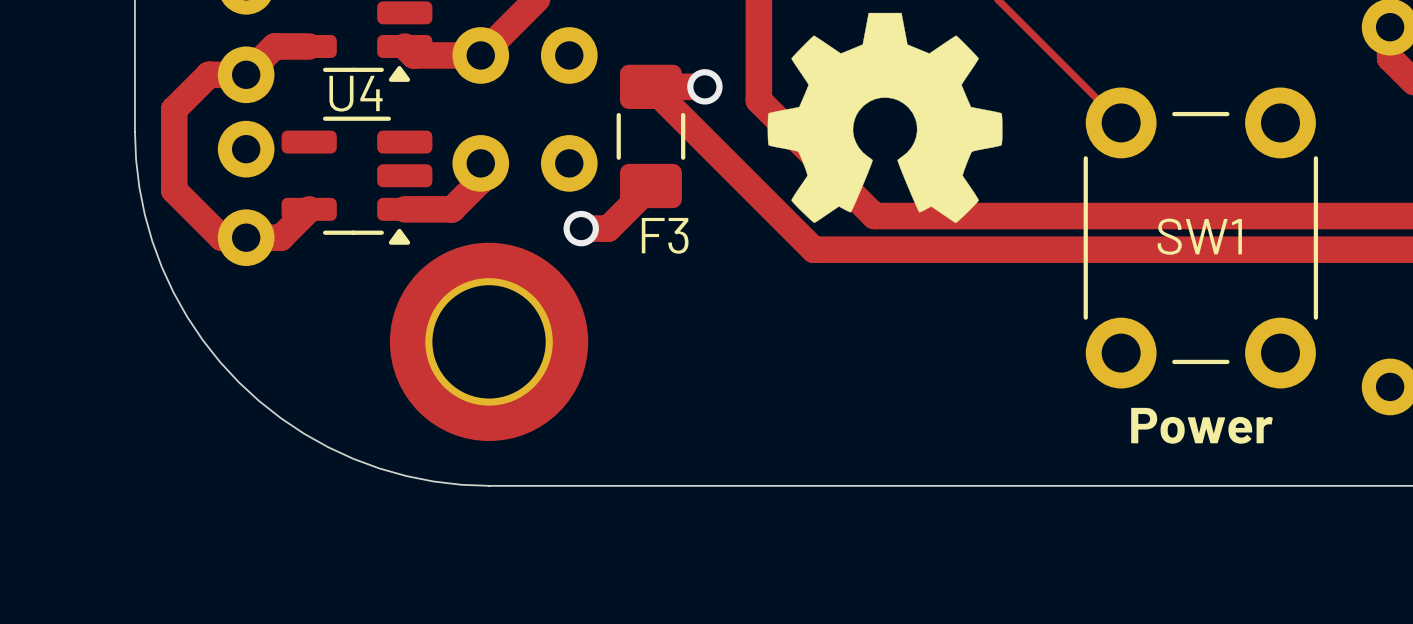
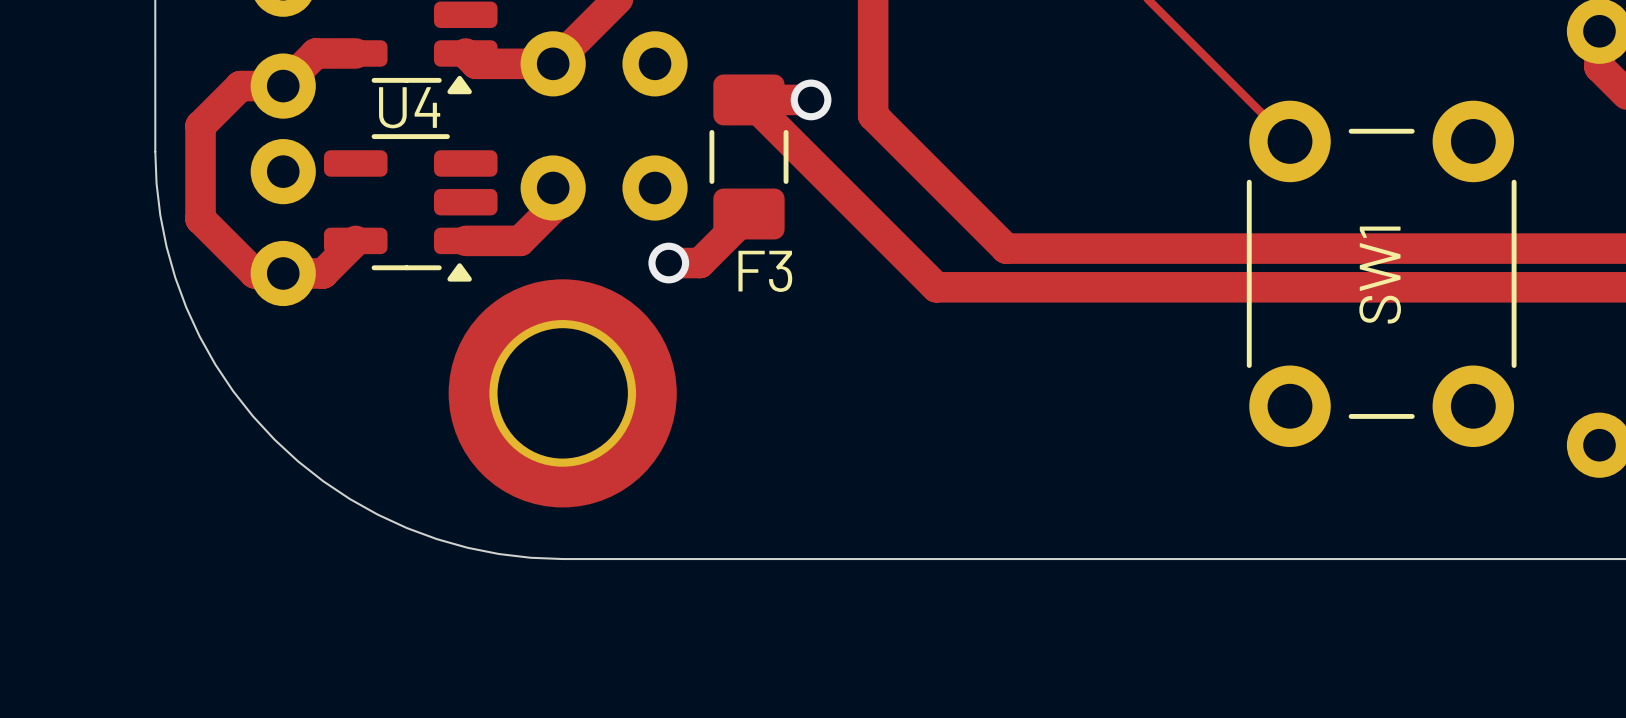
drawing: [767, 12, 1003, 223] -> none
SW1 name rotation: 0° (1199, 236) -> 90° counterclockwise (1380, 275)
text: Power (1201, 425) -> none

